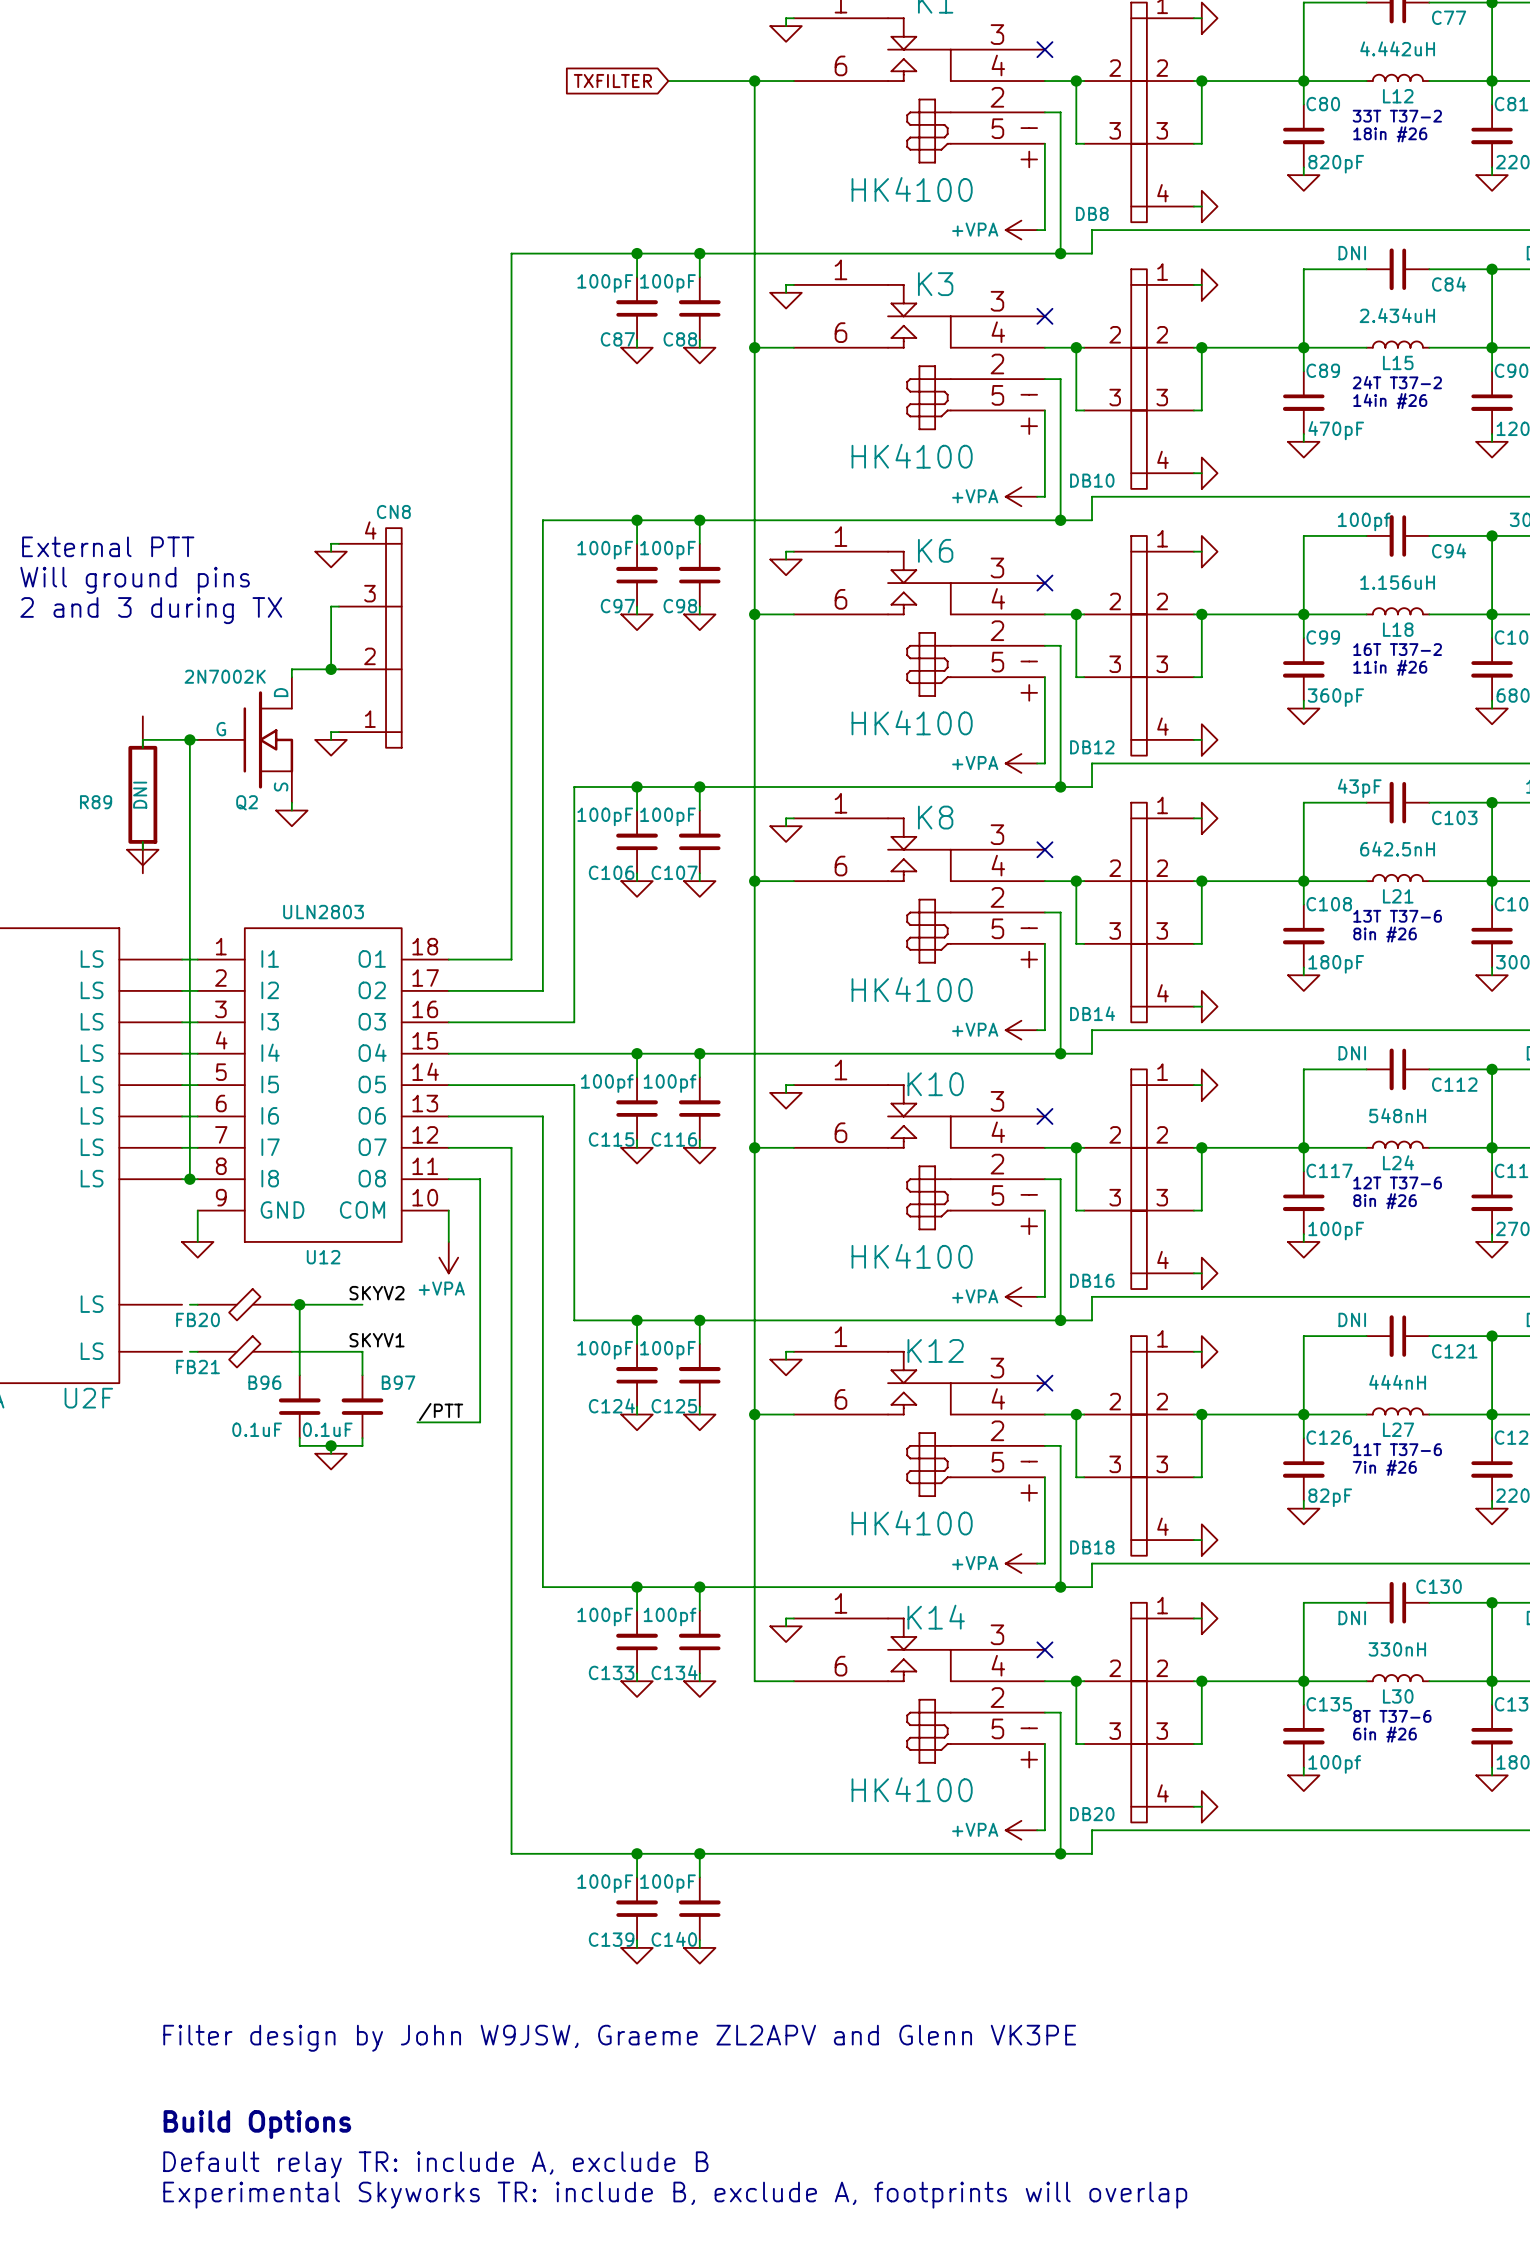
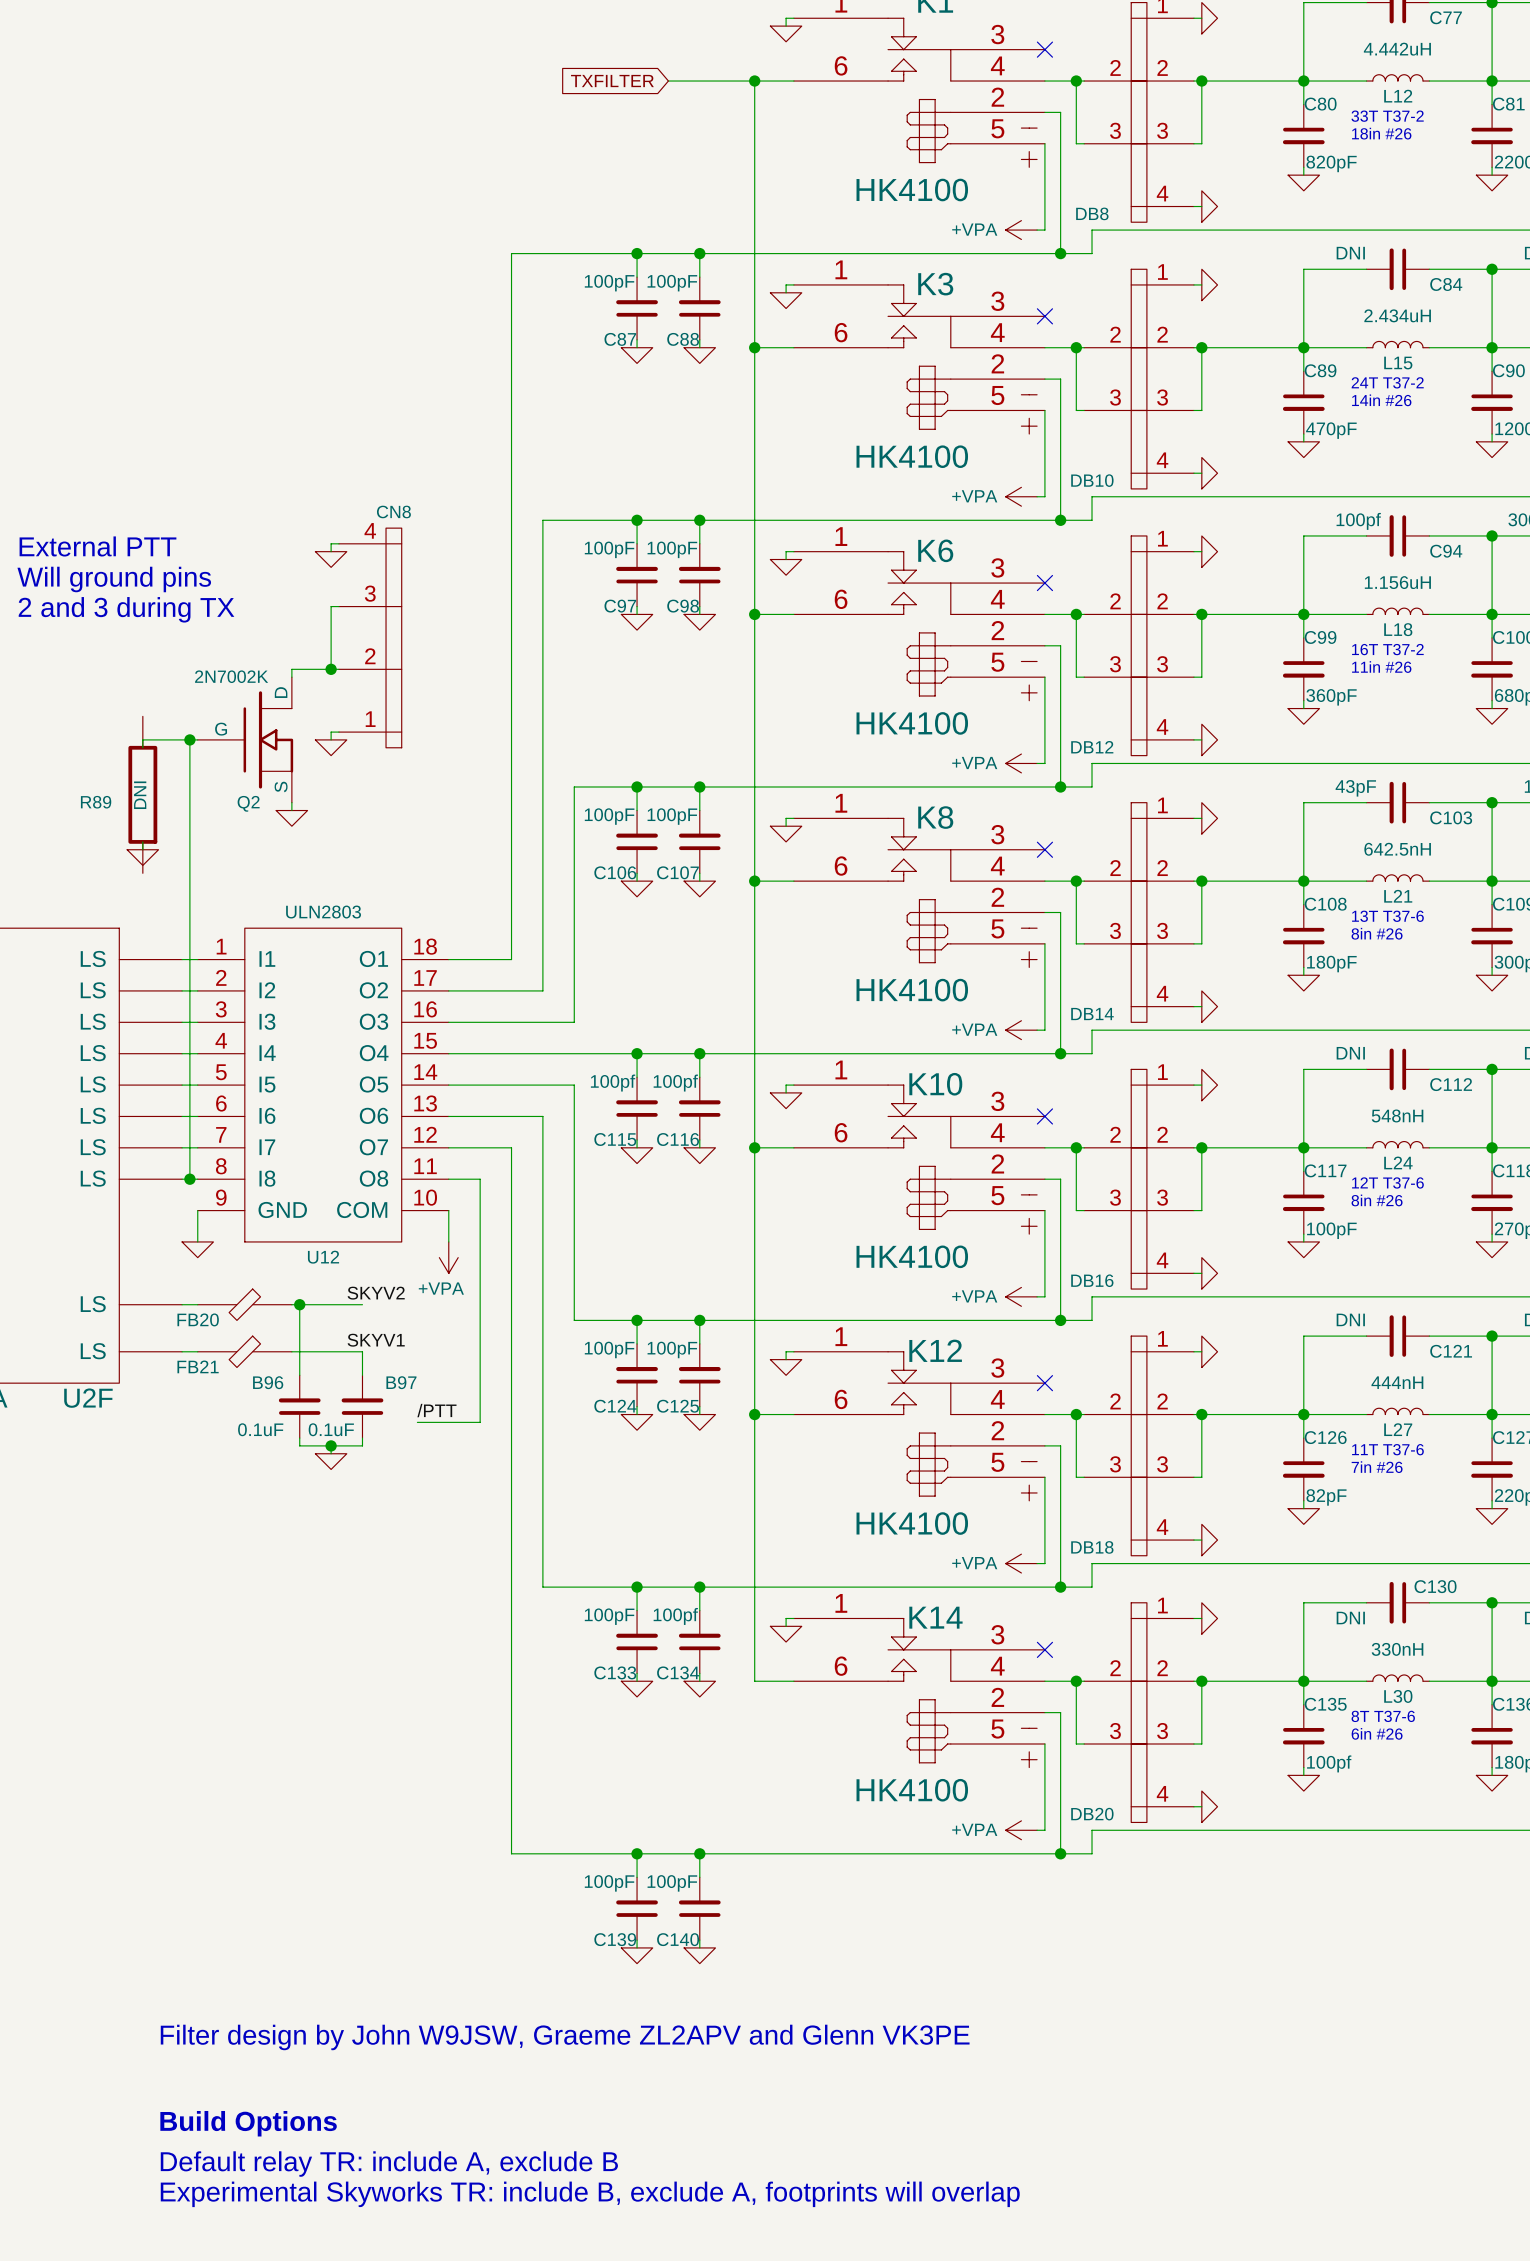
wire: none -> (182, 1304) (189, 1304)
wire: none -> (182, 1351) (189, 1351)

